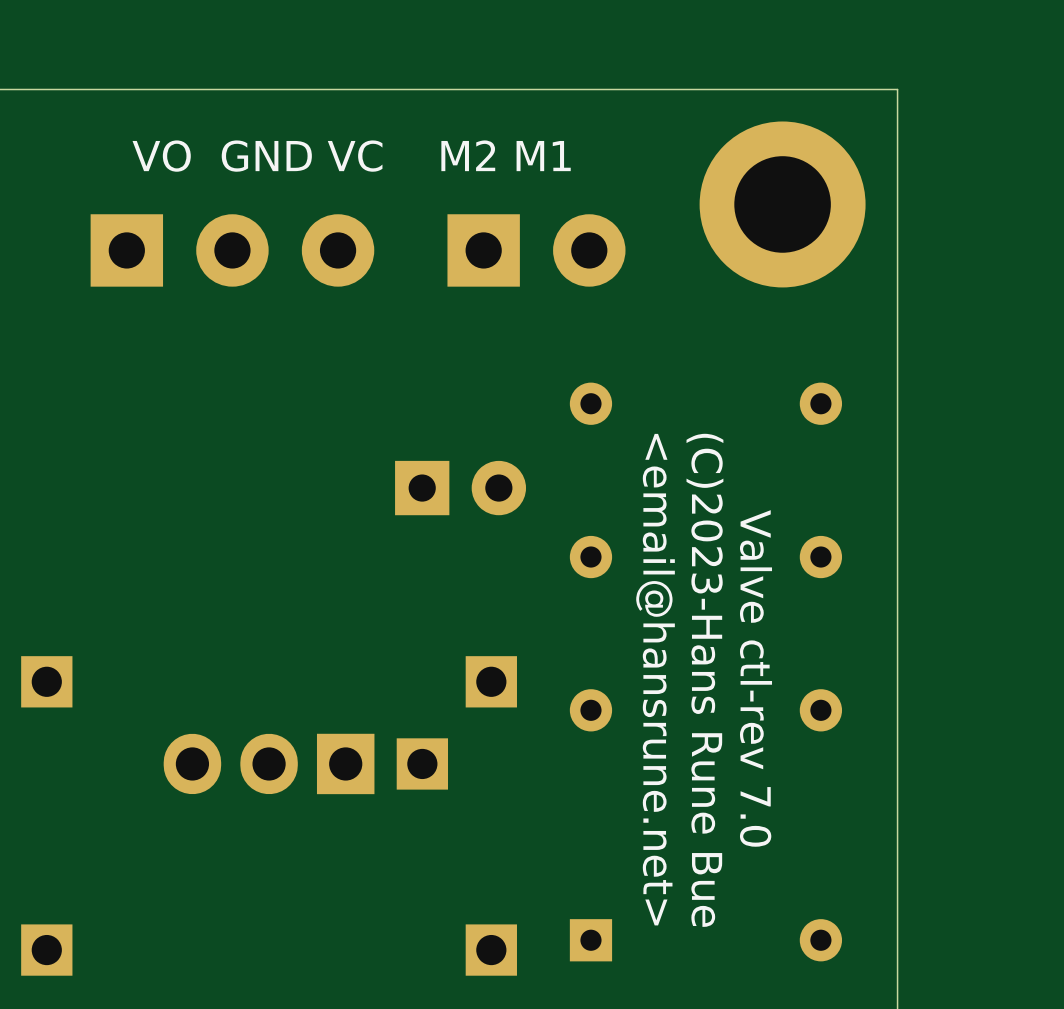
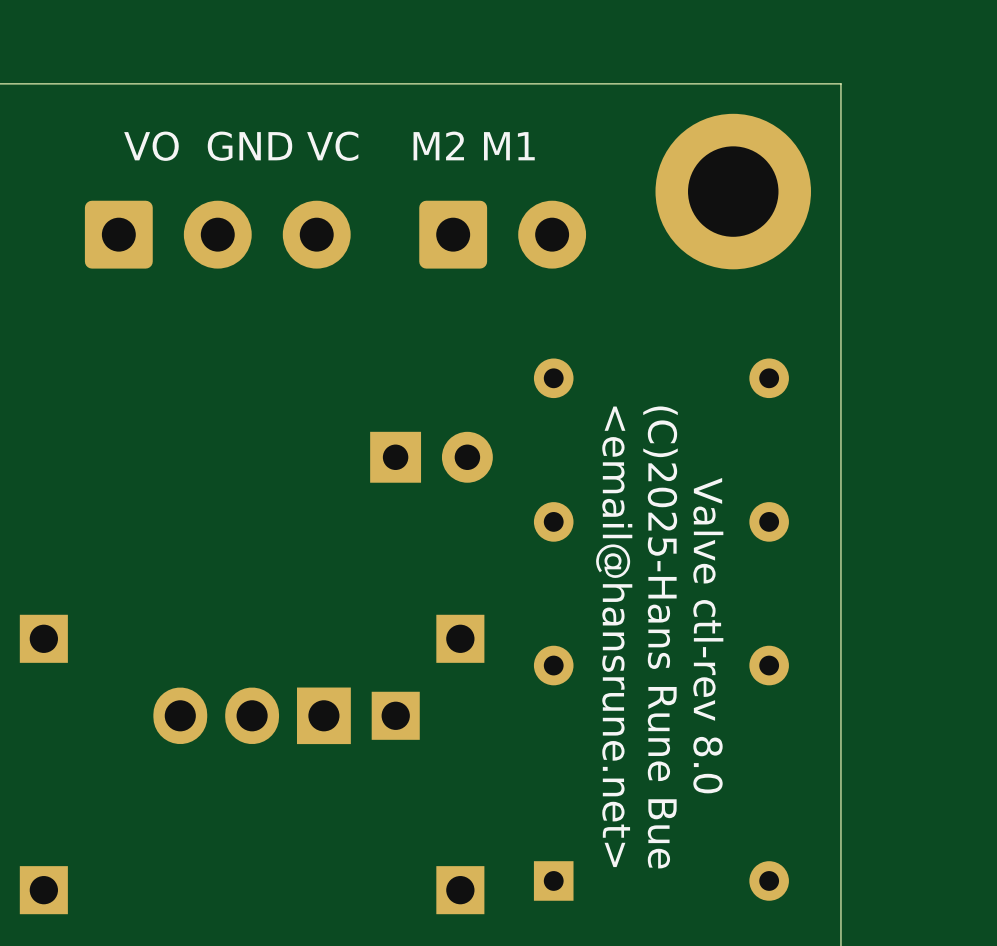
part footprint: [90, 214, 375, 287] -> [84, 200, 351, 269]
part footprint: [447, 214, 626, 287] -> [419, 200, 587, 269]
text: Valve ctl-rev 7.0 (755, 678) -> Valve ctl-rev 8.0 (708, 635)
text: (C)2023-Hans Rune Bue (704, 680) -> (C)2025-Hans Rune Bue (660, 637)

